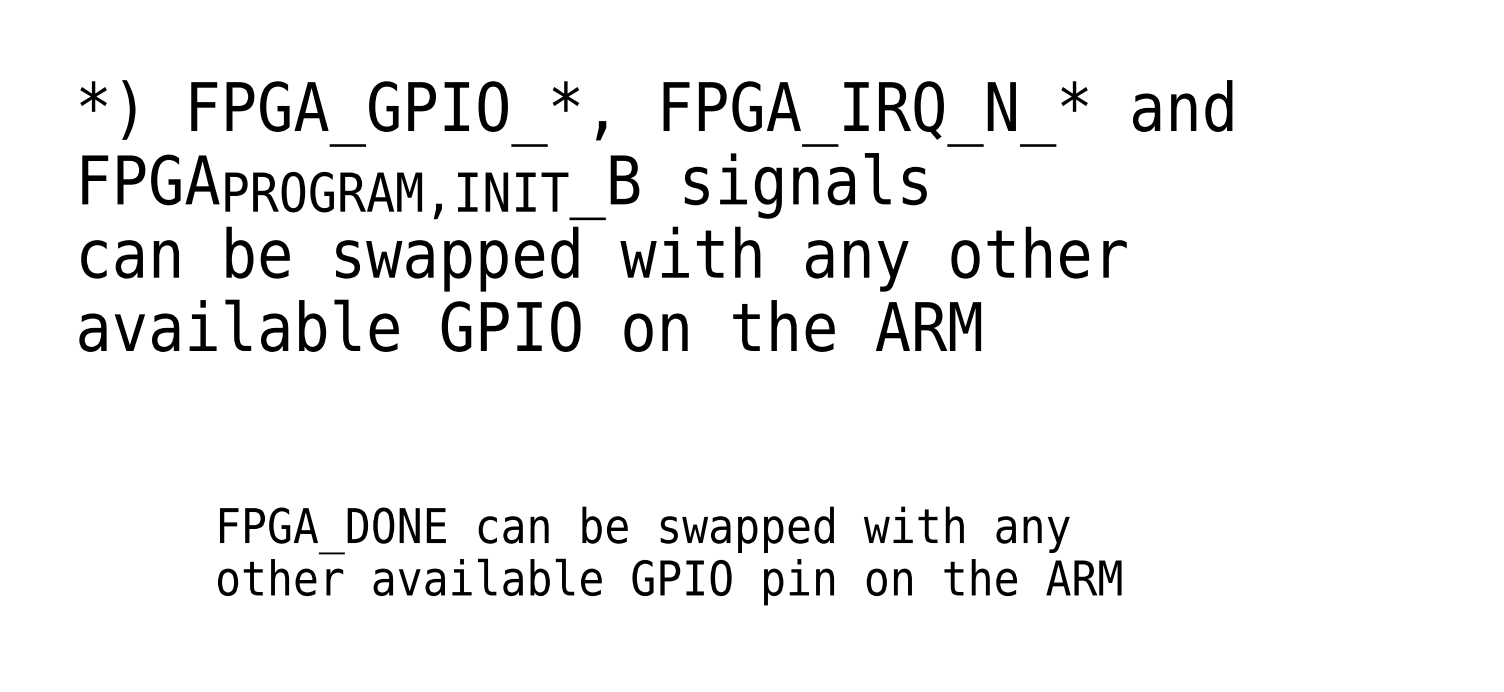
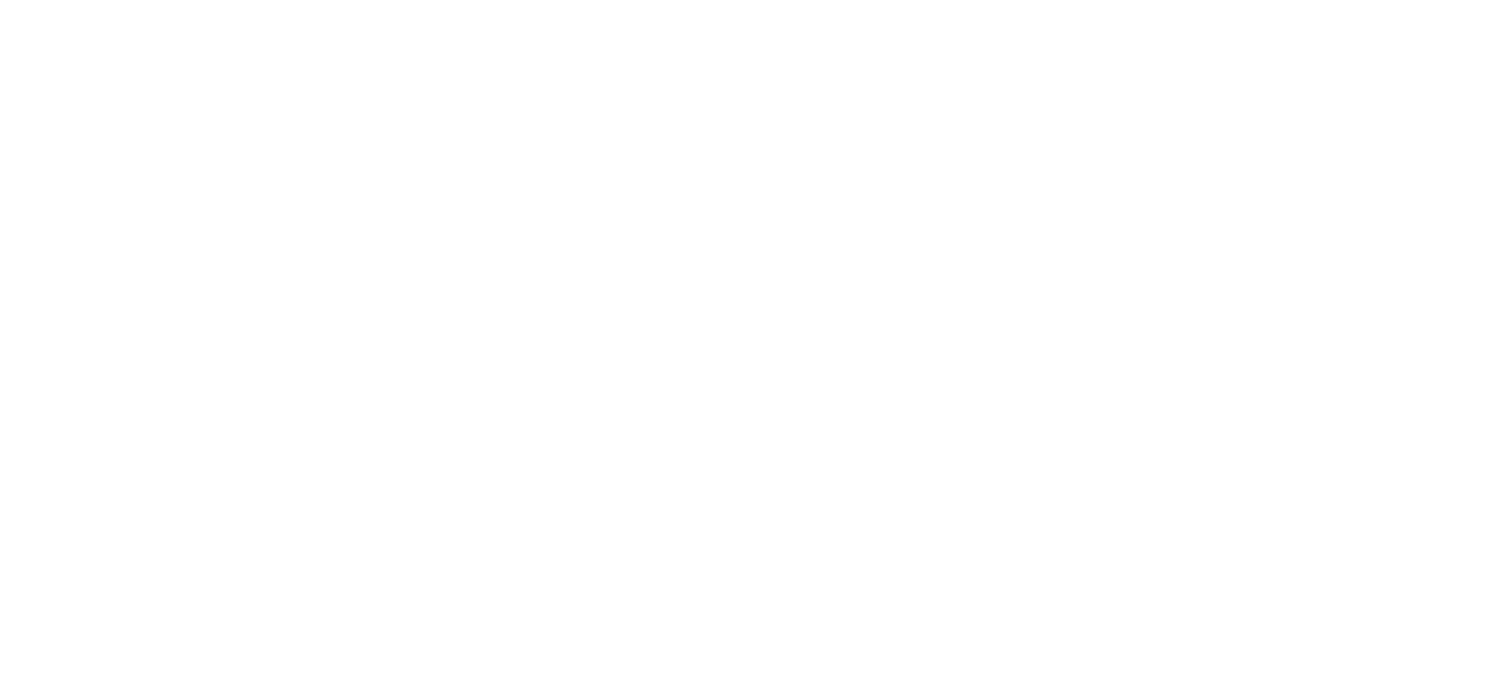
text: *) FPGA_GPIO_*, FPGA_IRQ_N_* and (656, 113) -> none
text: FPGAPROGRAM,INIT_B signals (504, 186) -> none
text: can be swapped with any other (603, 259) -> none
text: available GPIO on the ARM (530, 325) -> none
text: FPGA_DONE can be swapped with any (644, 530) -> none
text: other available GPIO pin on the ARM (669, 582) -> none

